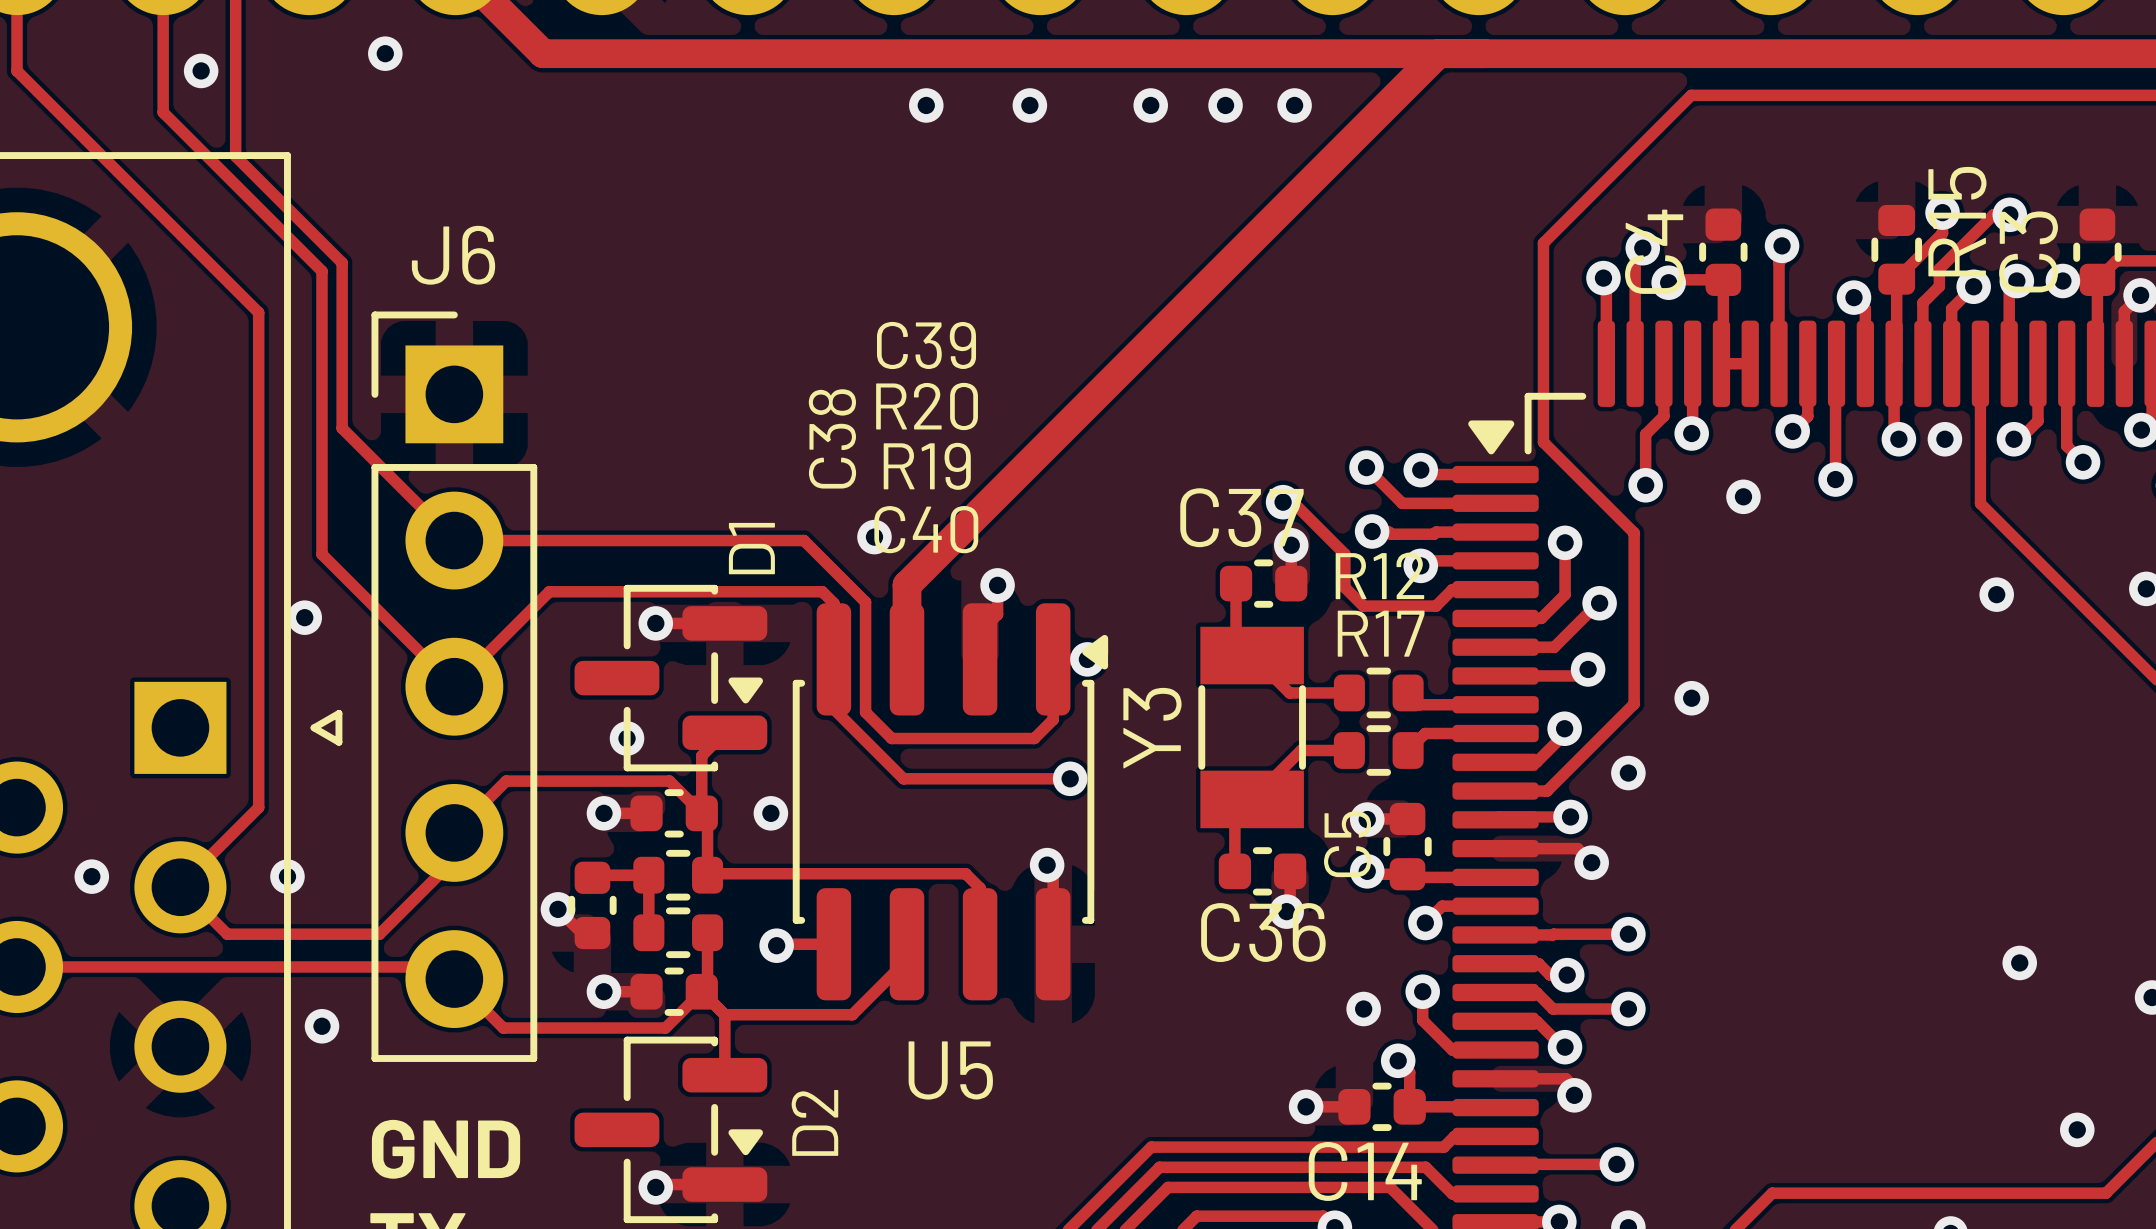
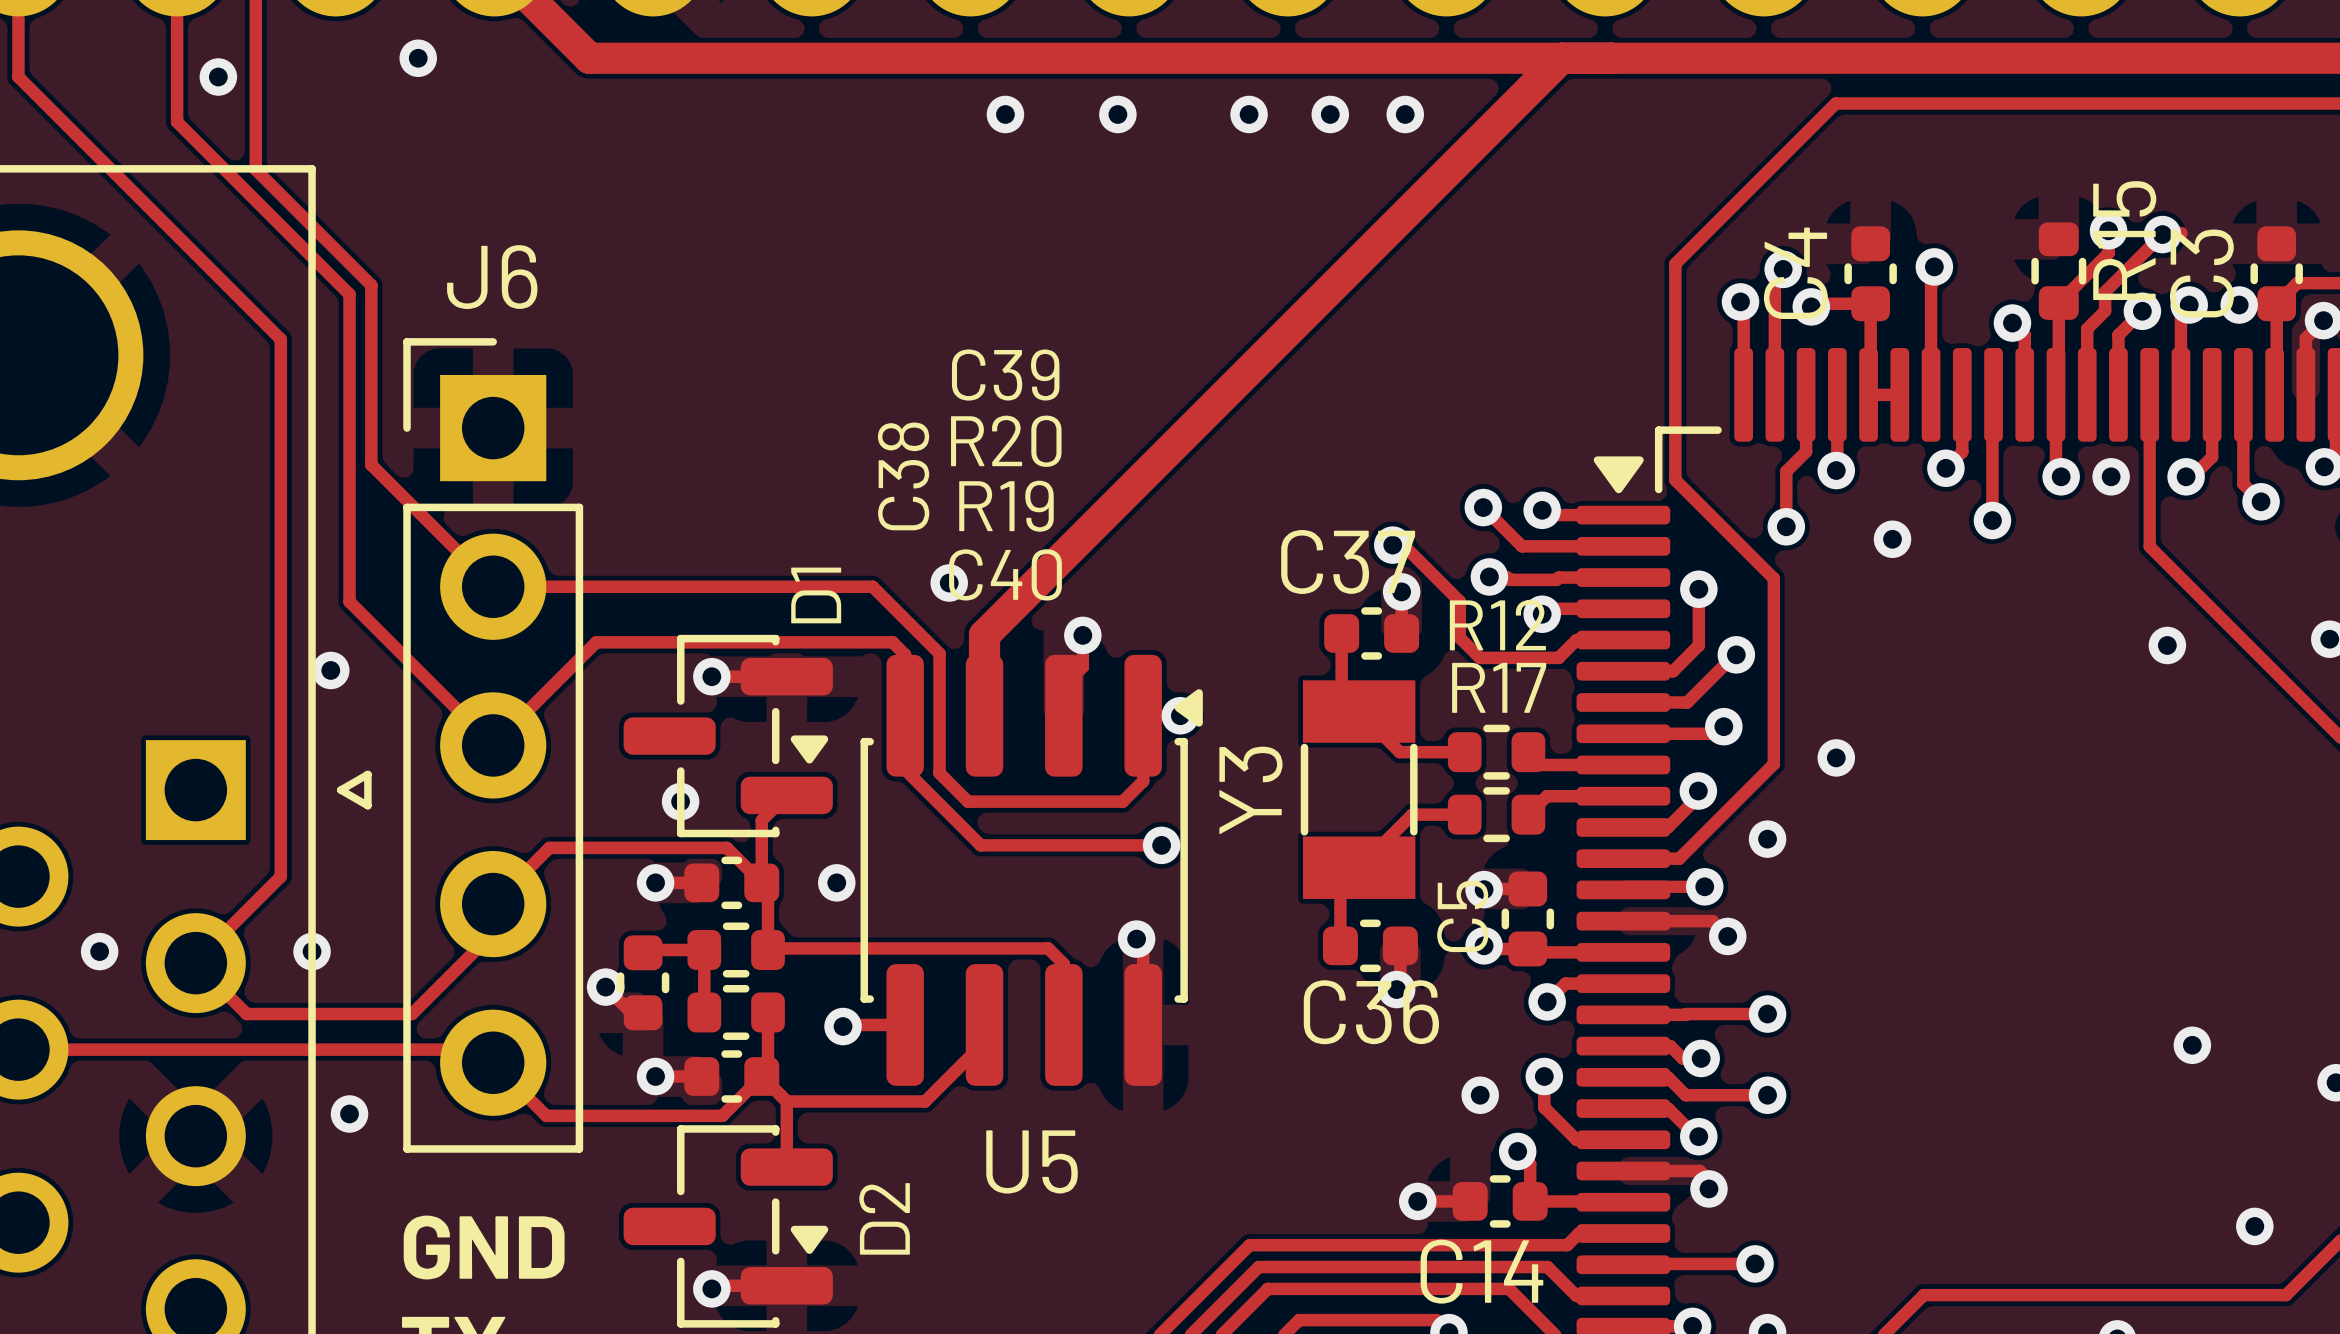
via position: (2009, 214) -> (2162, 234)

